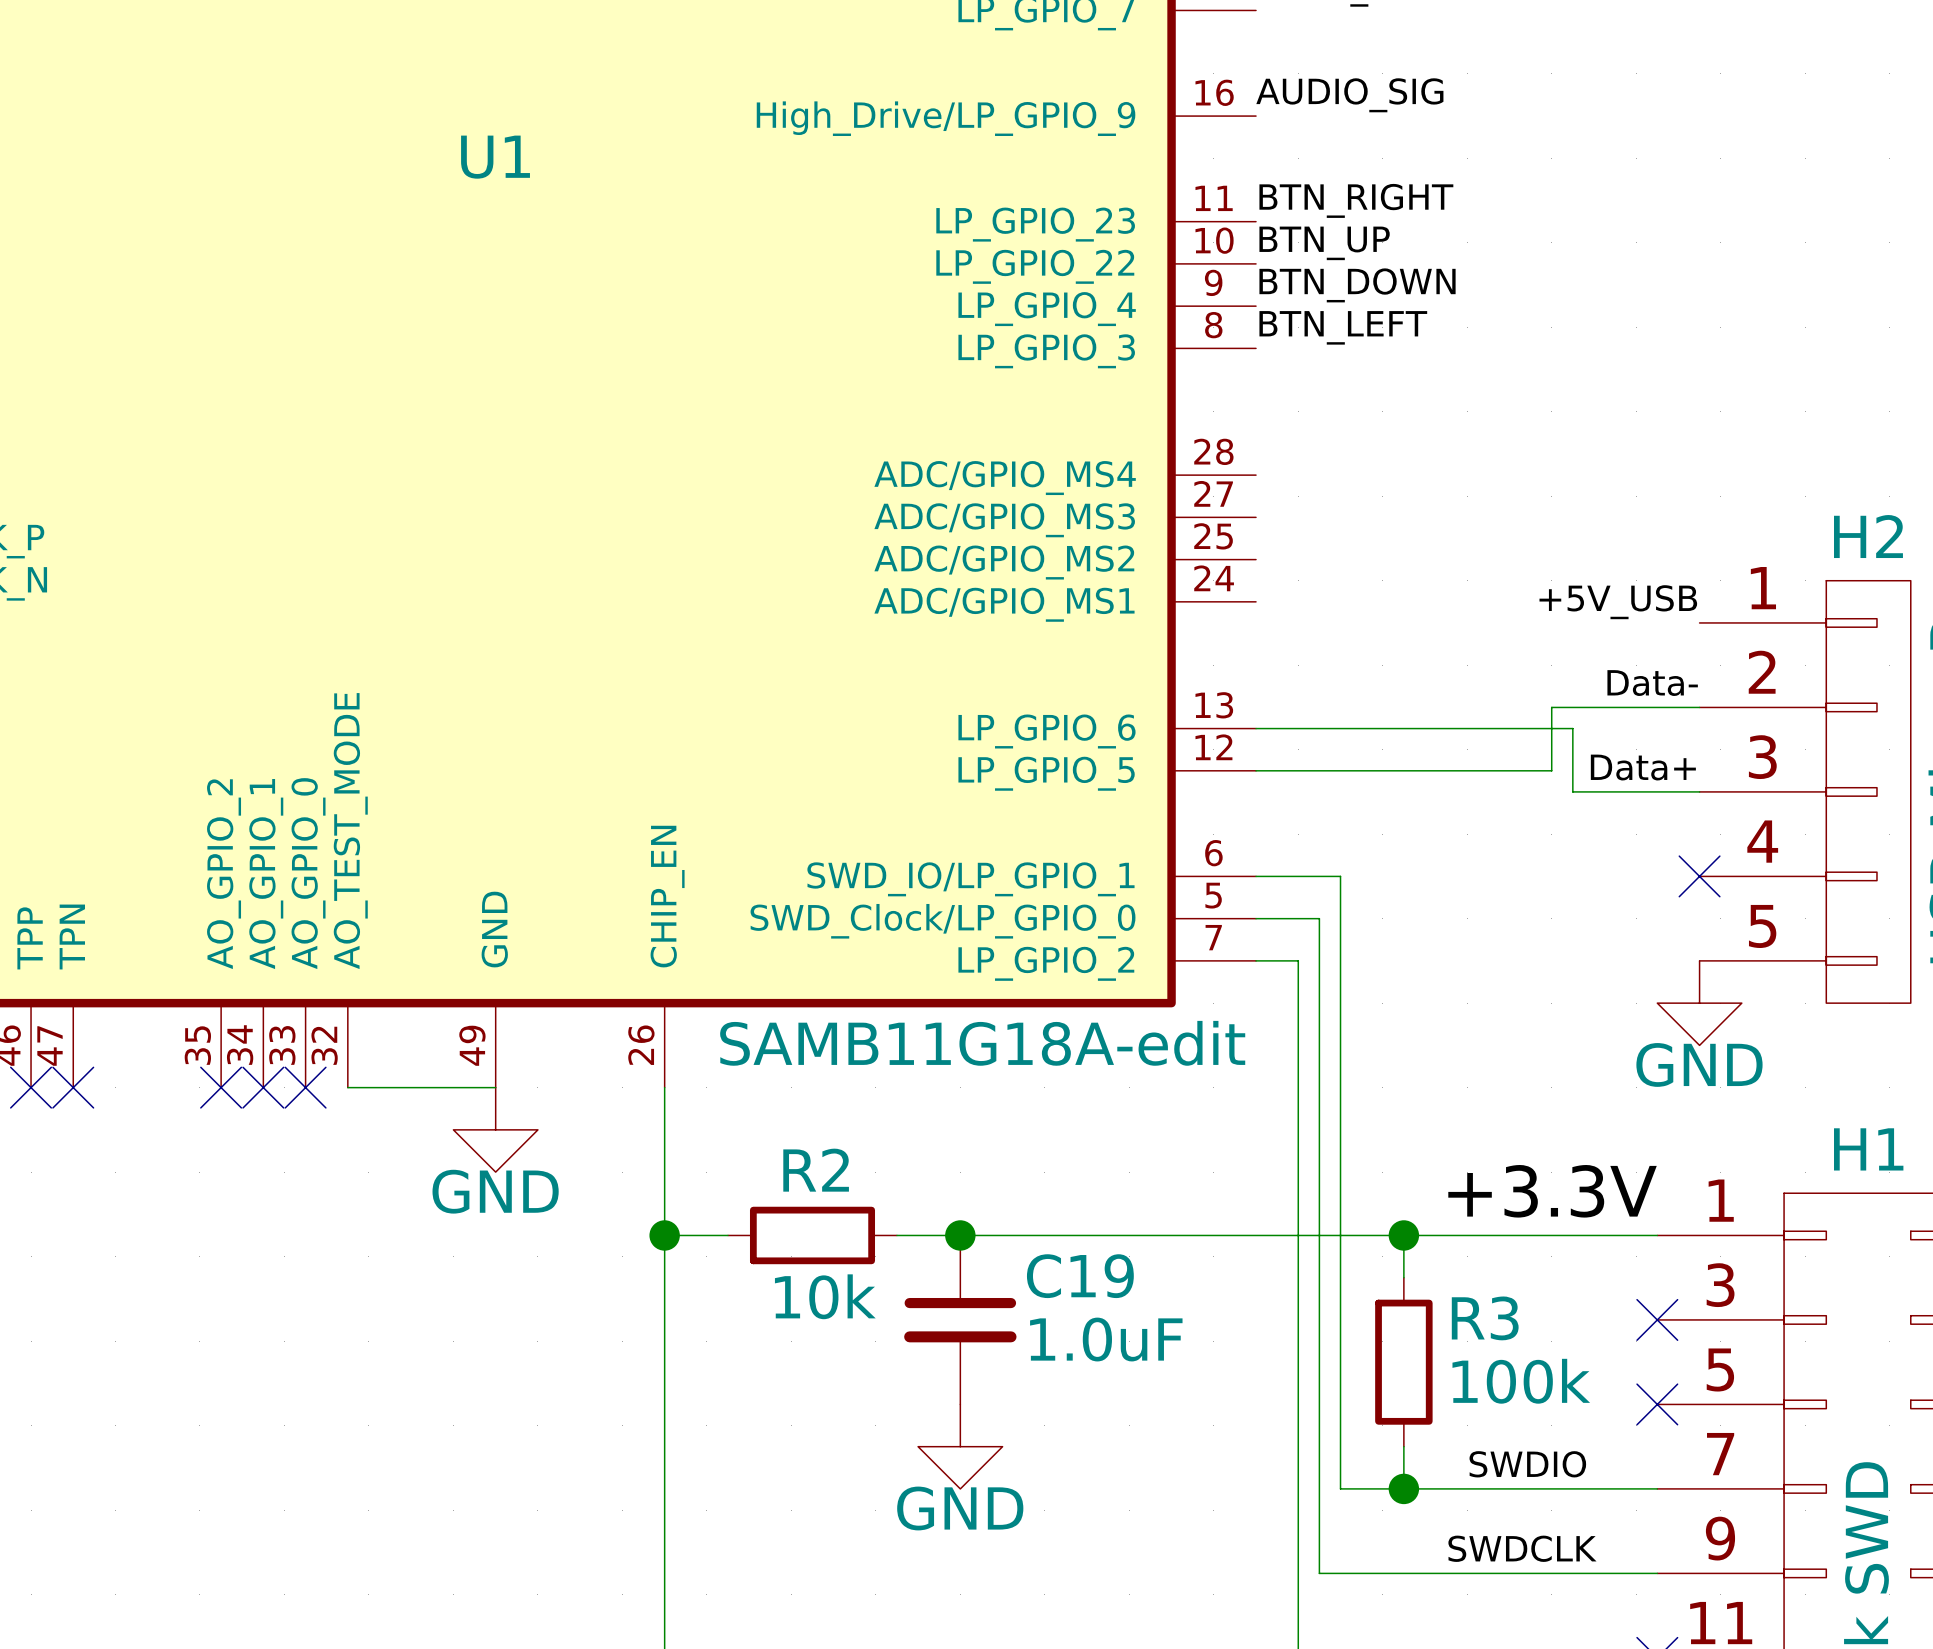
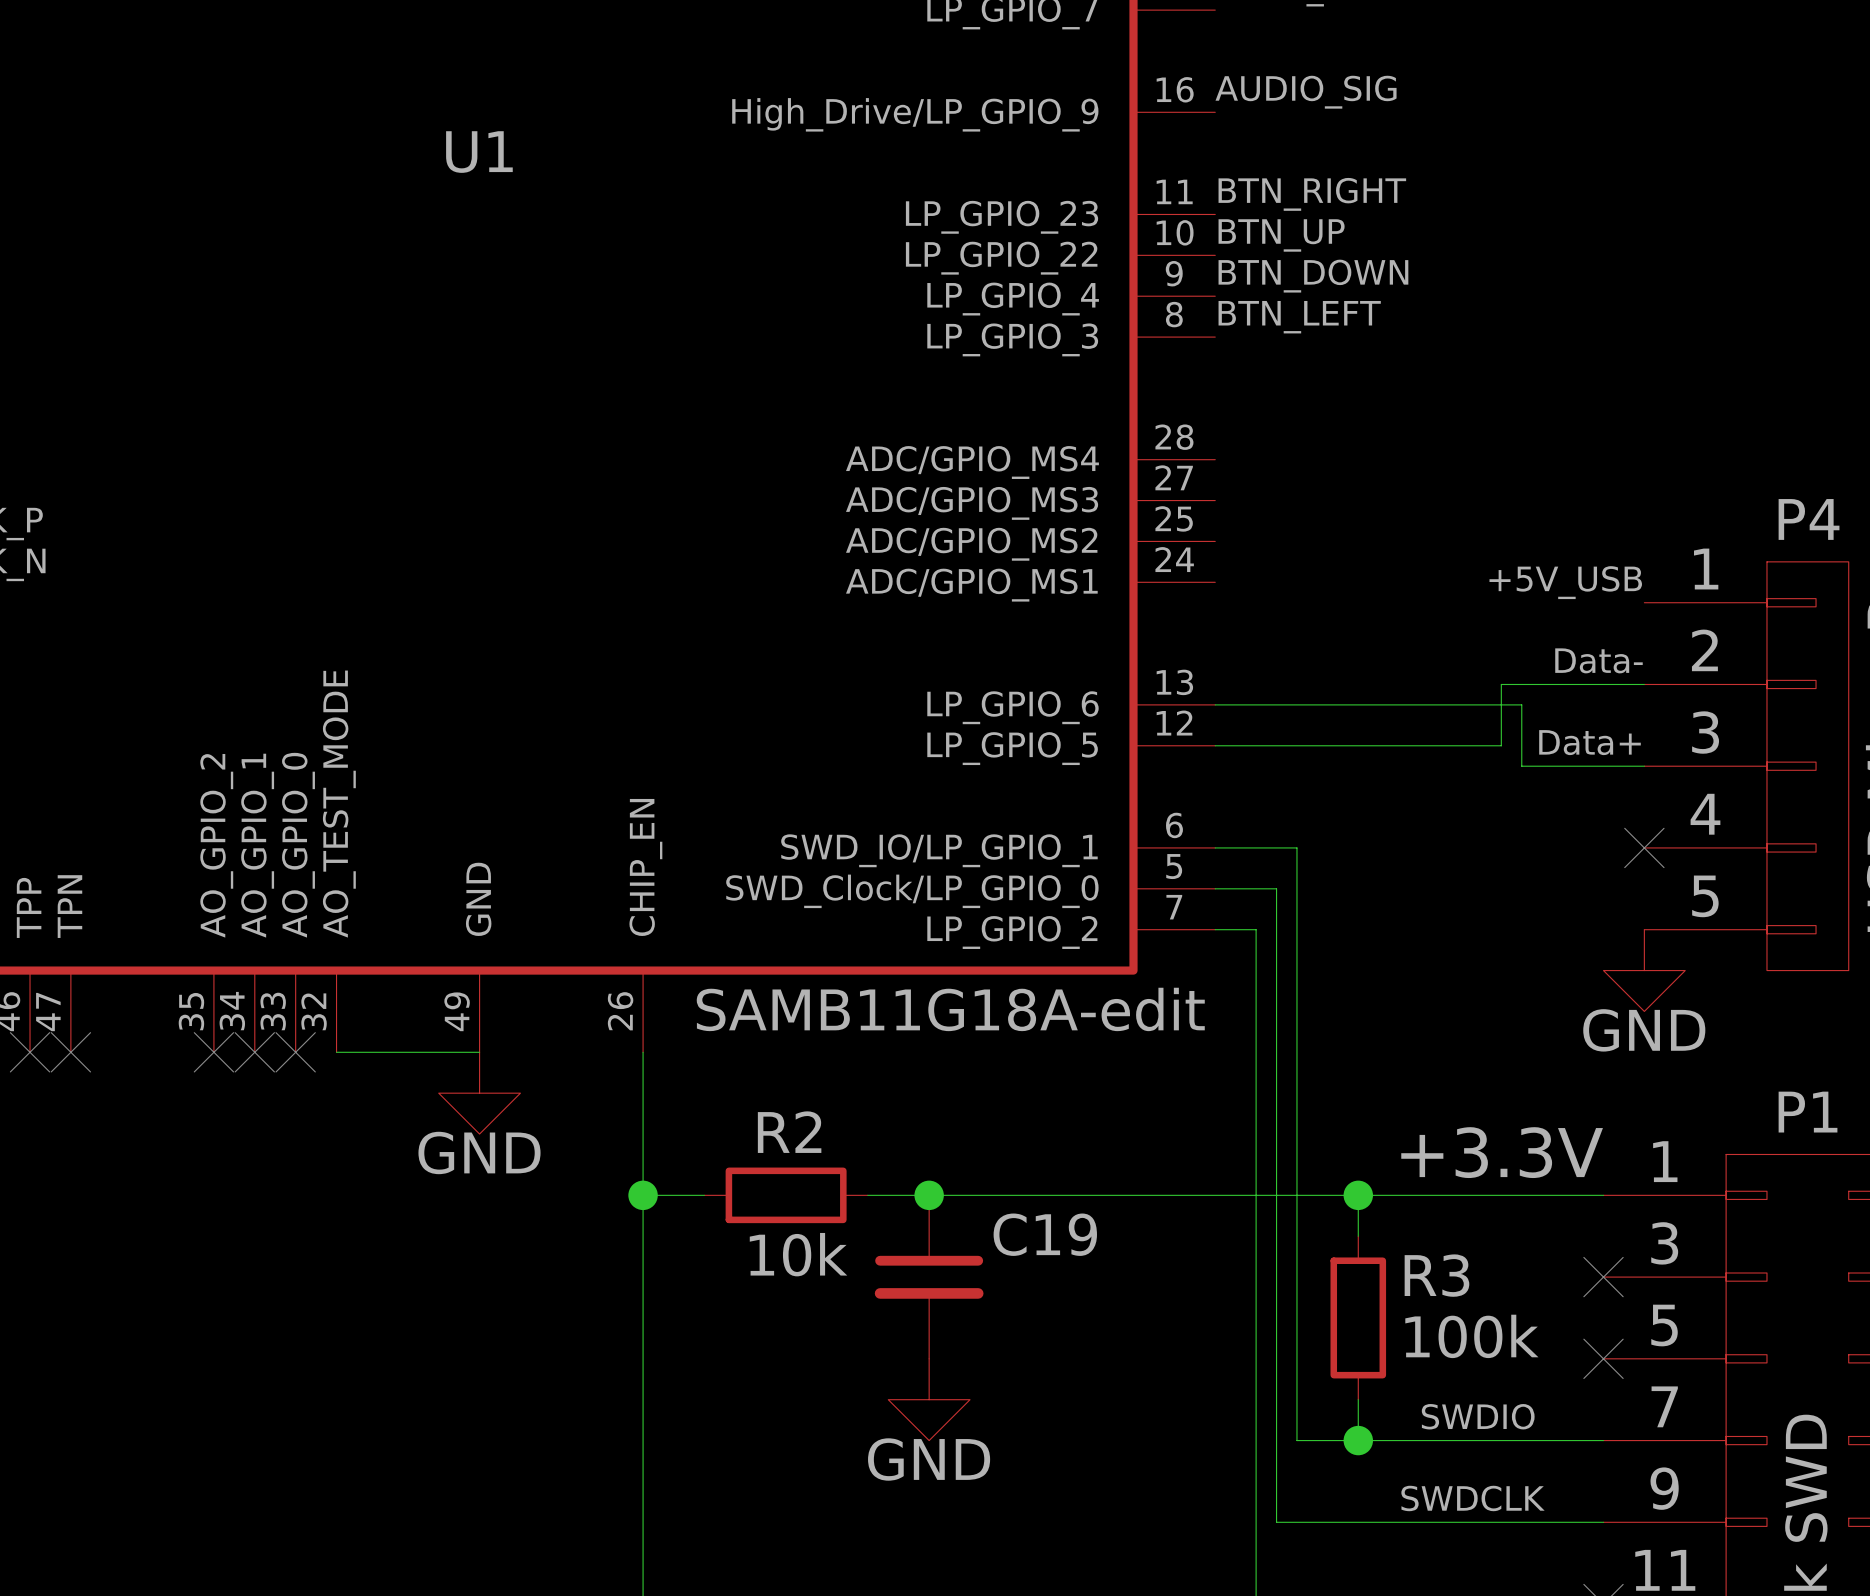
H2 name: H2 (1868, 536) -> P4 (1809, 519)
H1 name: H1 (1868, 1149) -> P1 (1808, 1112)
C19 value: 1.0uF (1106, 1339) -> none

